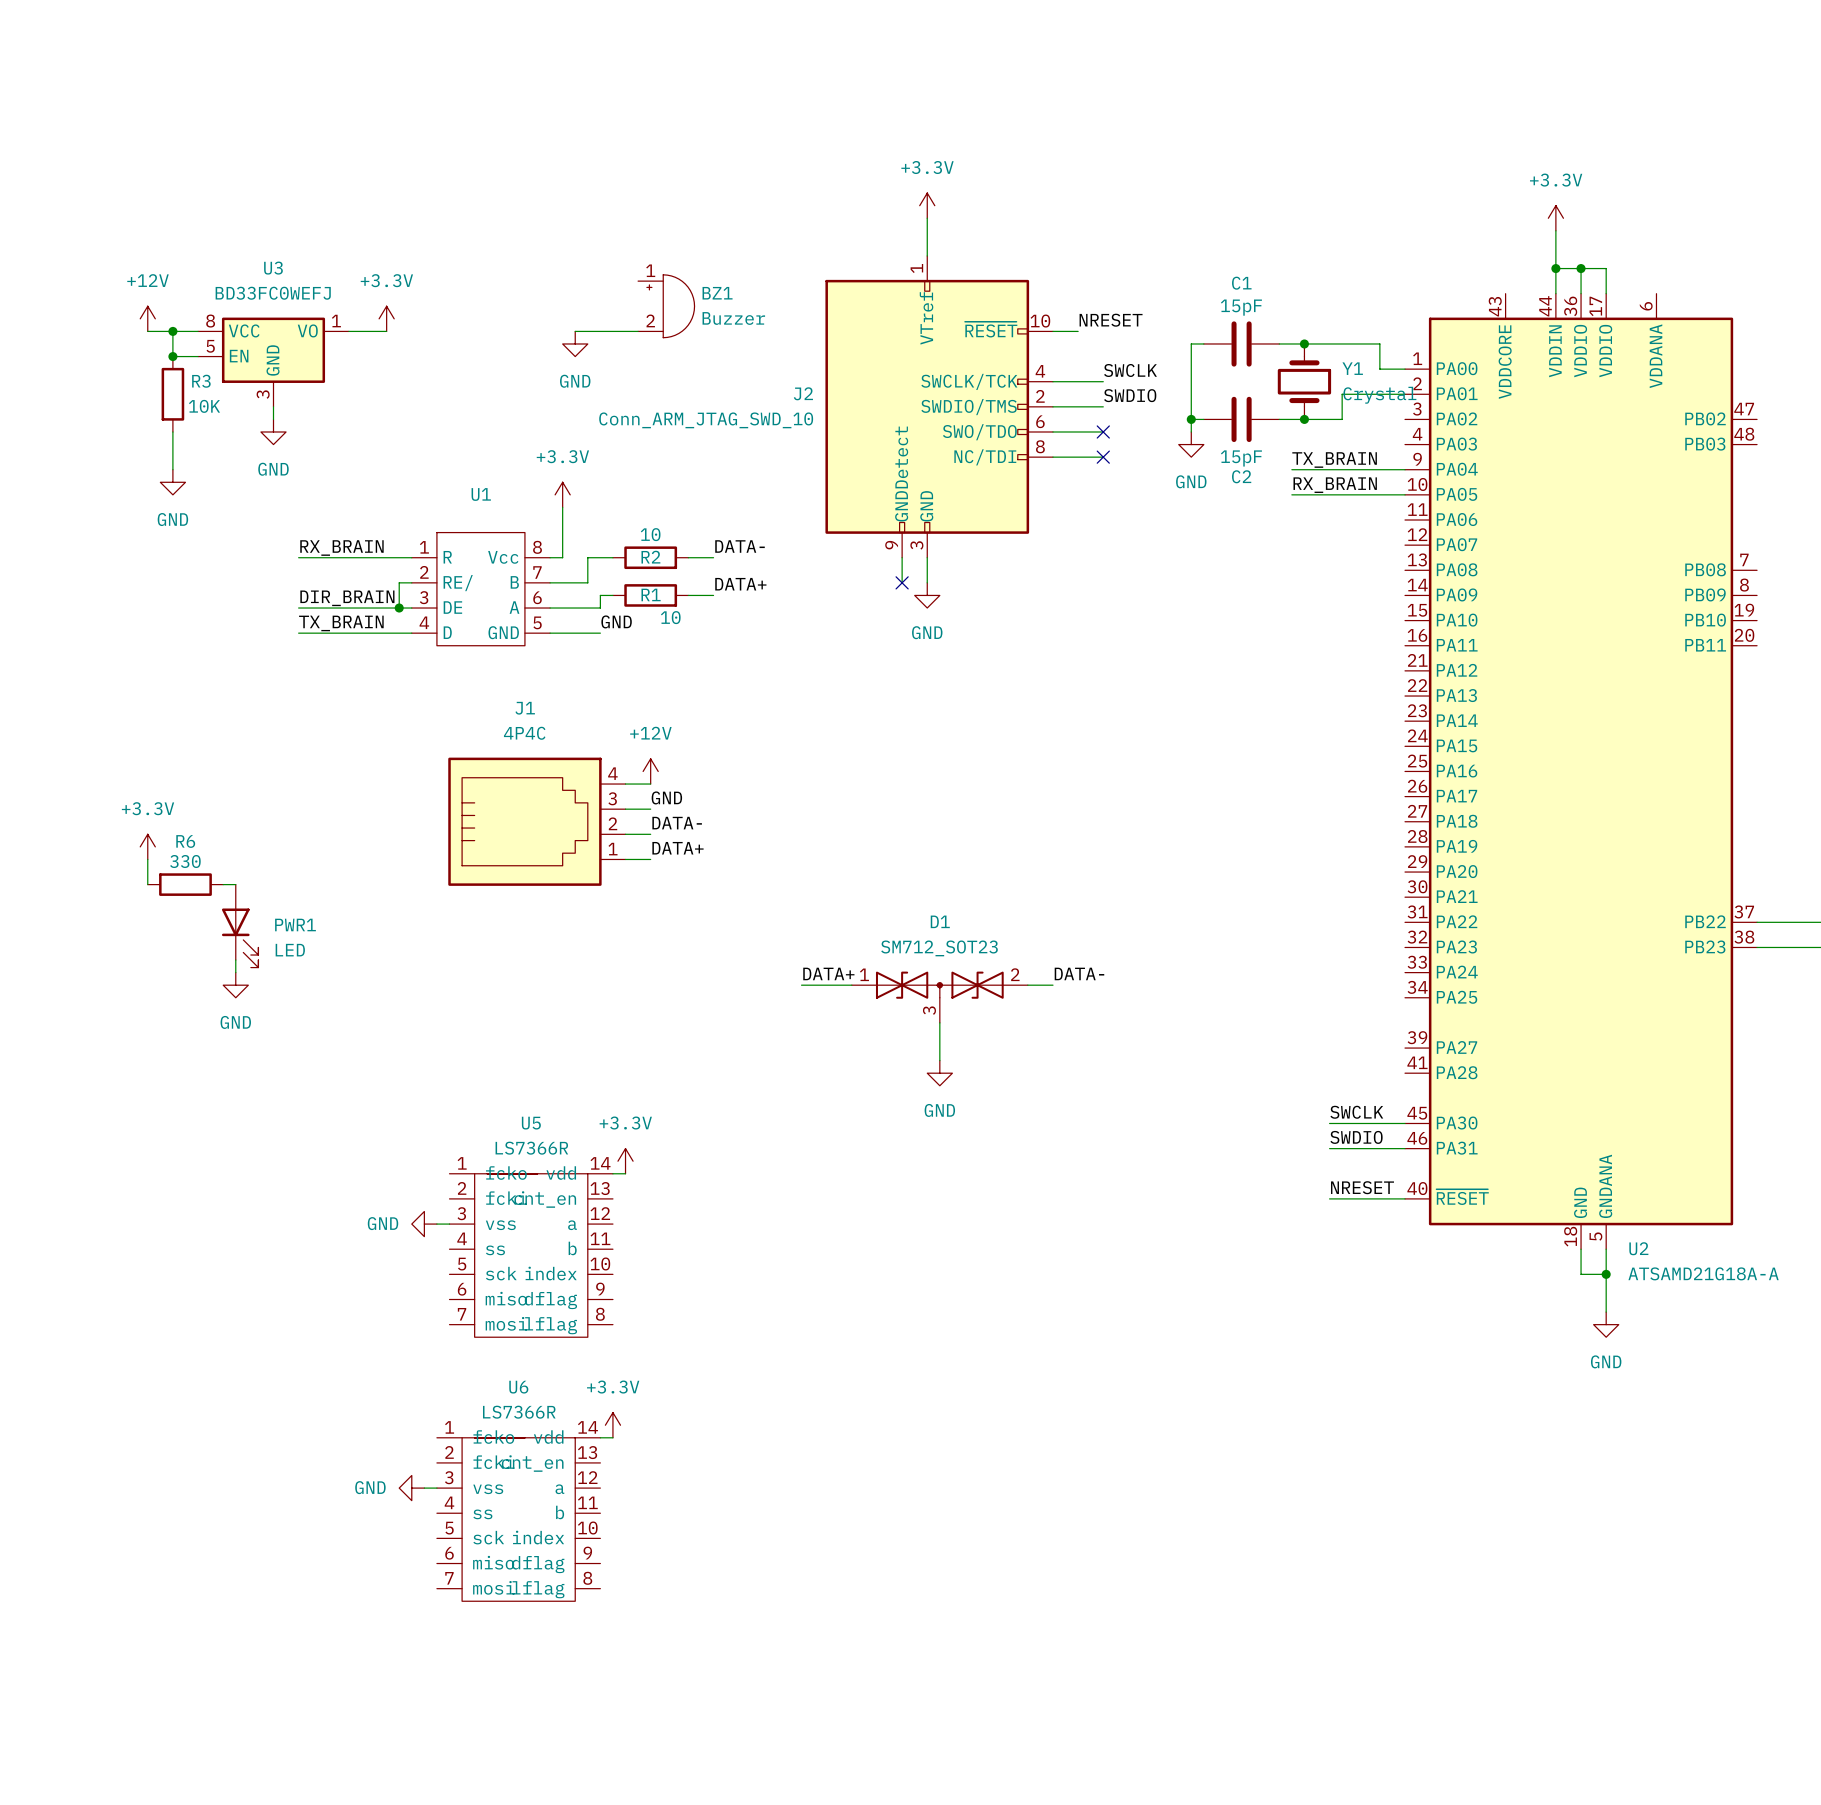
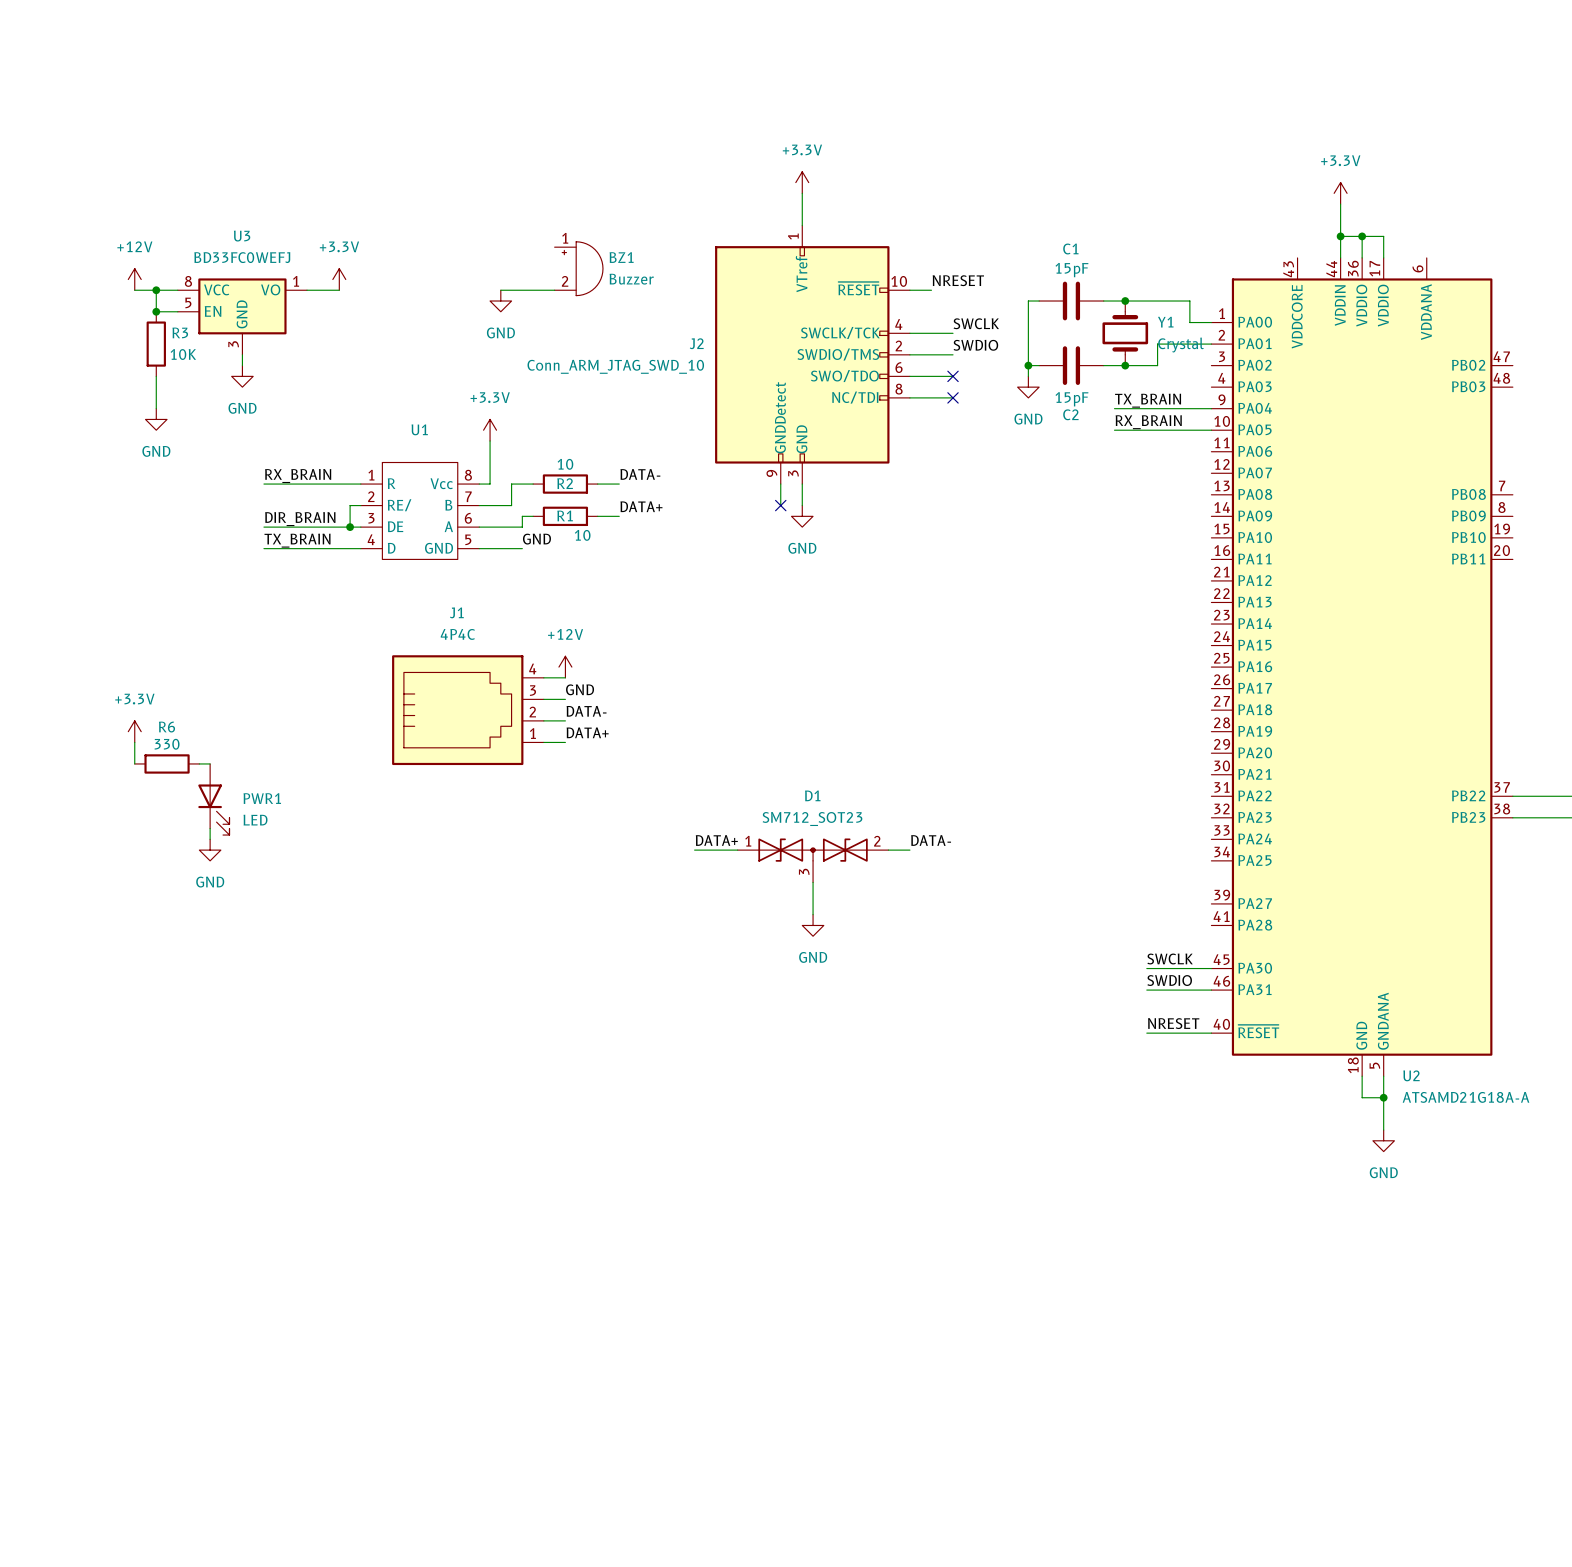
power symbol: +3.3V (625, 1161) -> none
wire: (612, 1173) (625, 1173) -> none
power symbol: GND (424, 1224) -> none
wire: (436, 1224) (449, 1224) -> none
U5: LS7366R (531, 1255) -> none
power symbol: +3.3V (612, 1425) -> none
wire: (600, 1437) (612, 1437) -> none
power symbol: GND (411, 1488) -> none
wire: (424, 1488) (436, 1488) -> none
U6: LS7366R (518, 1519) -> none

